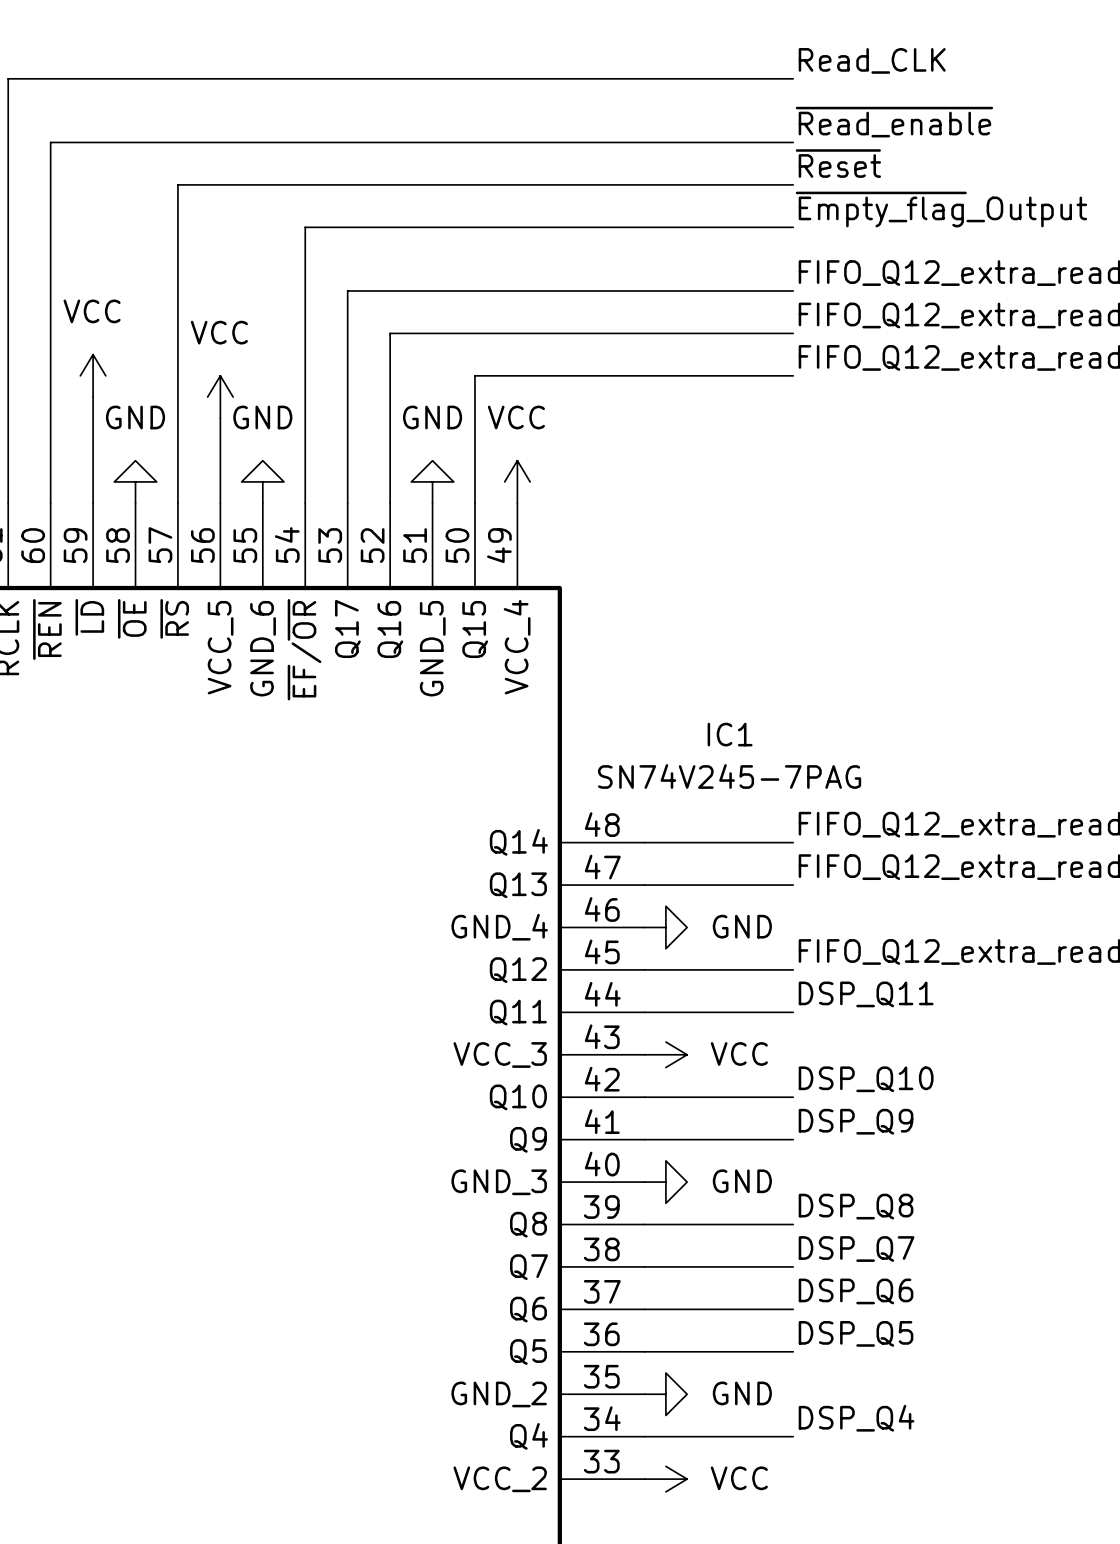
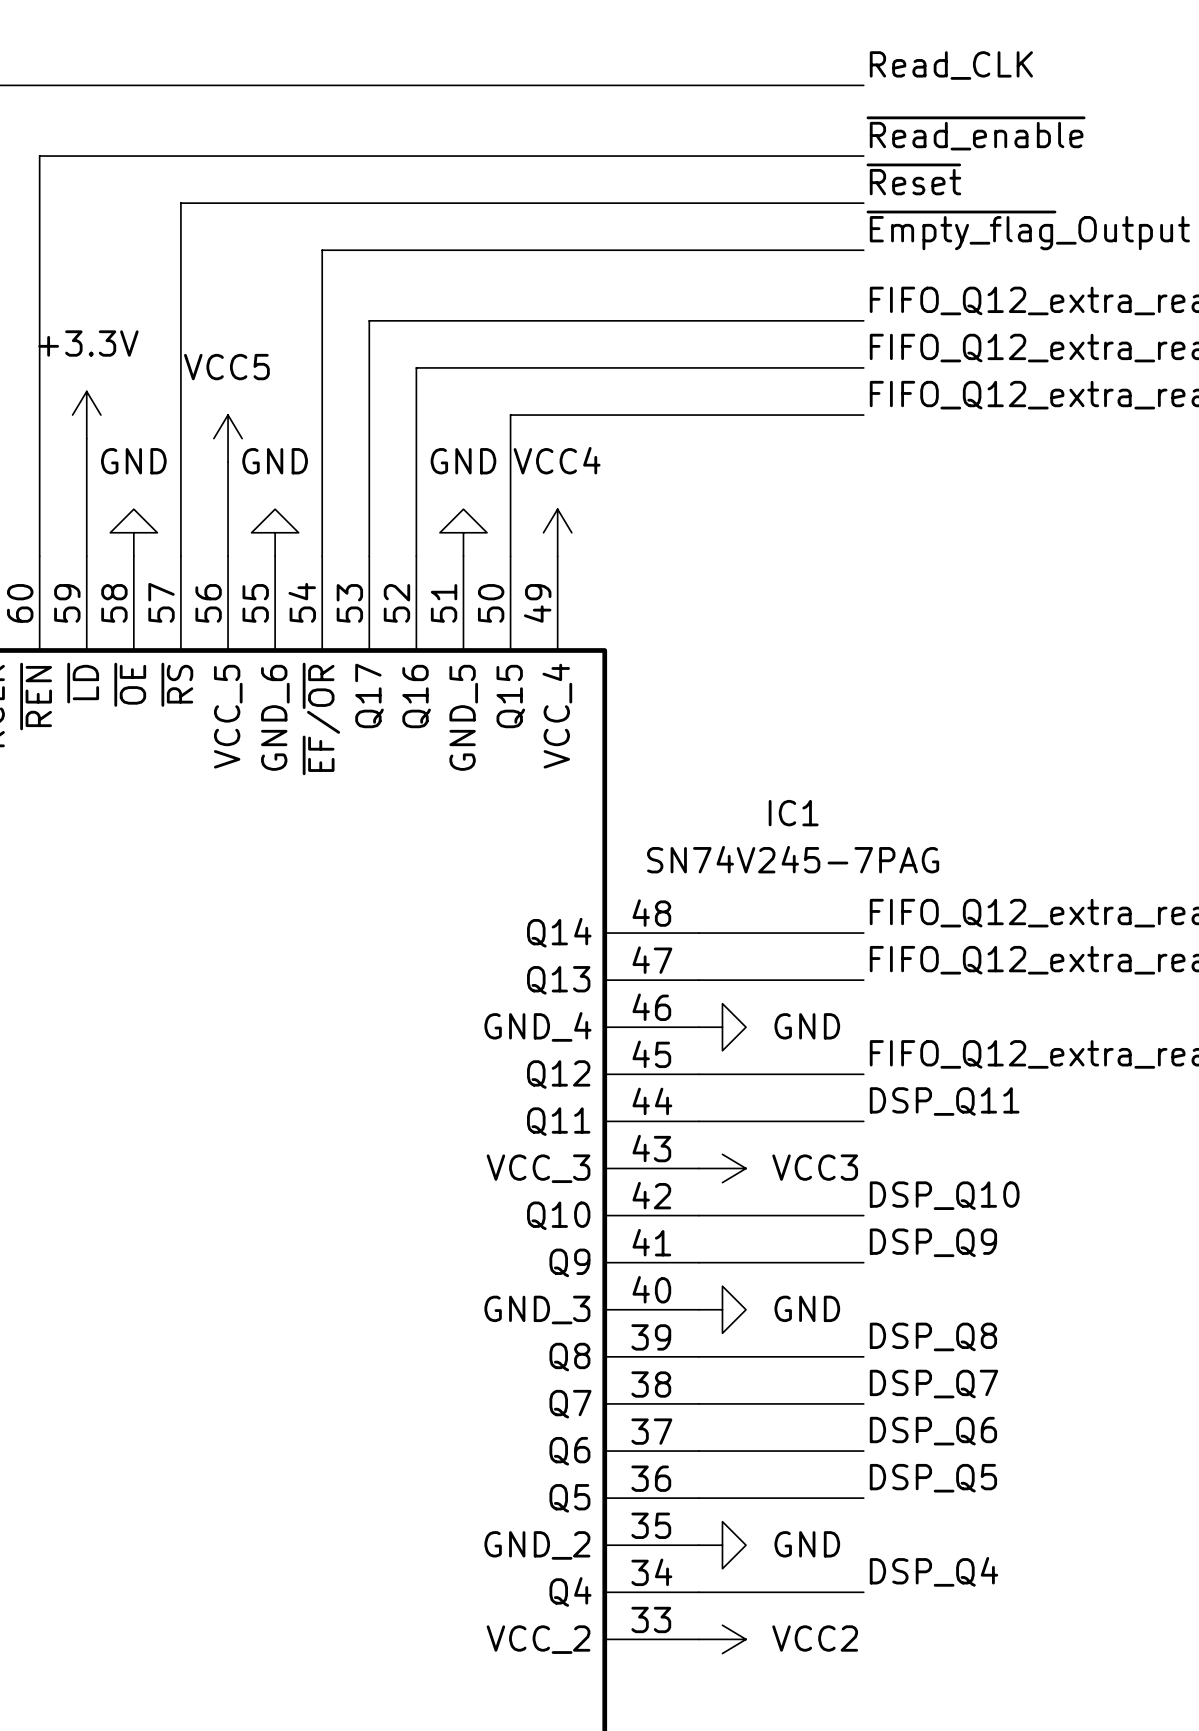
power symbol: VCC (93, 375) -> +3.3V (86, 415)
power symbol: VCC (220, 397) -> VCC5 (228, 438)
power symbol: VCC (517, 481) -> VCC4 (557, 532)
power symbol: VCC (665, 1054) -> VCC3 (722, 1168)
power symbol: VCC (665, 1479) -> VCC2 (722, 1639)

